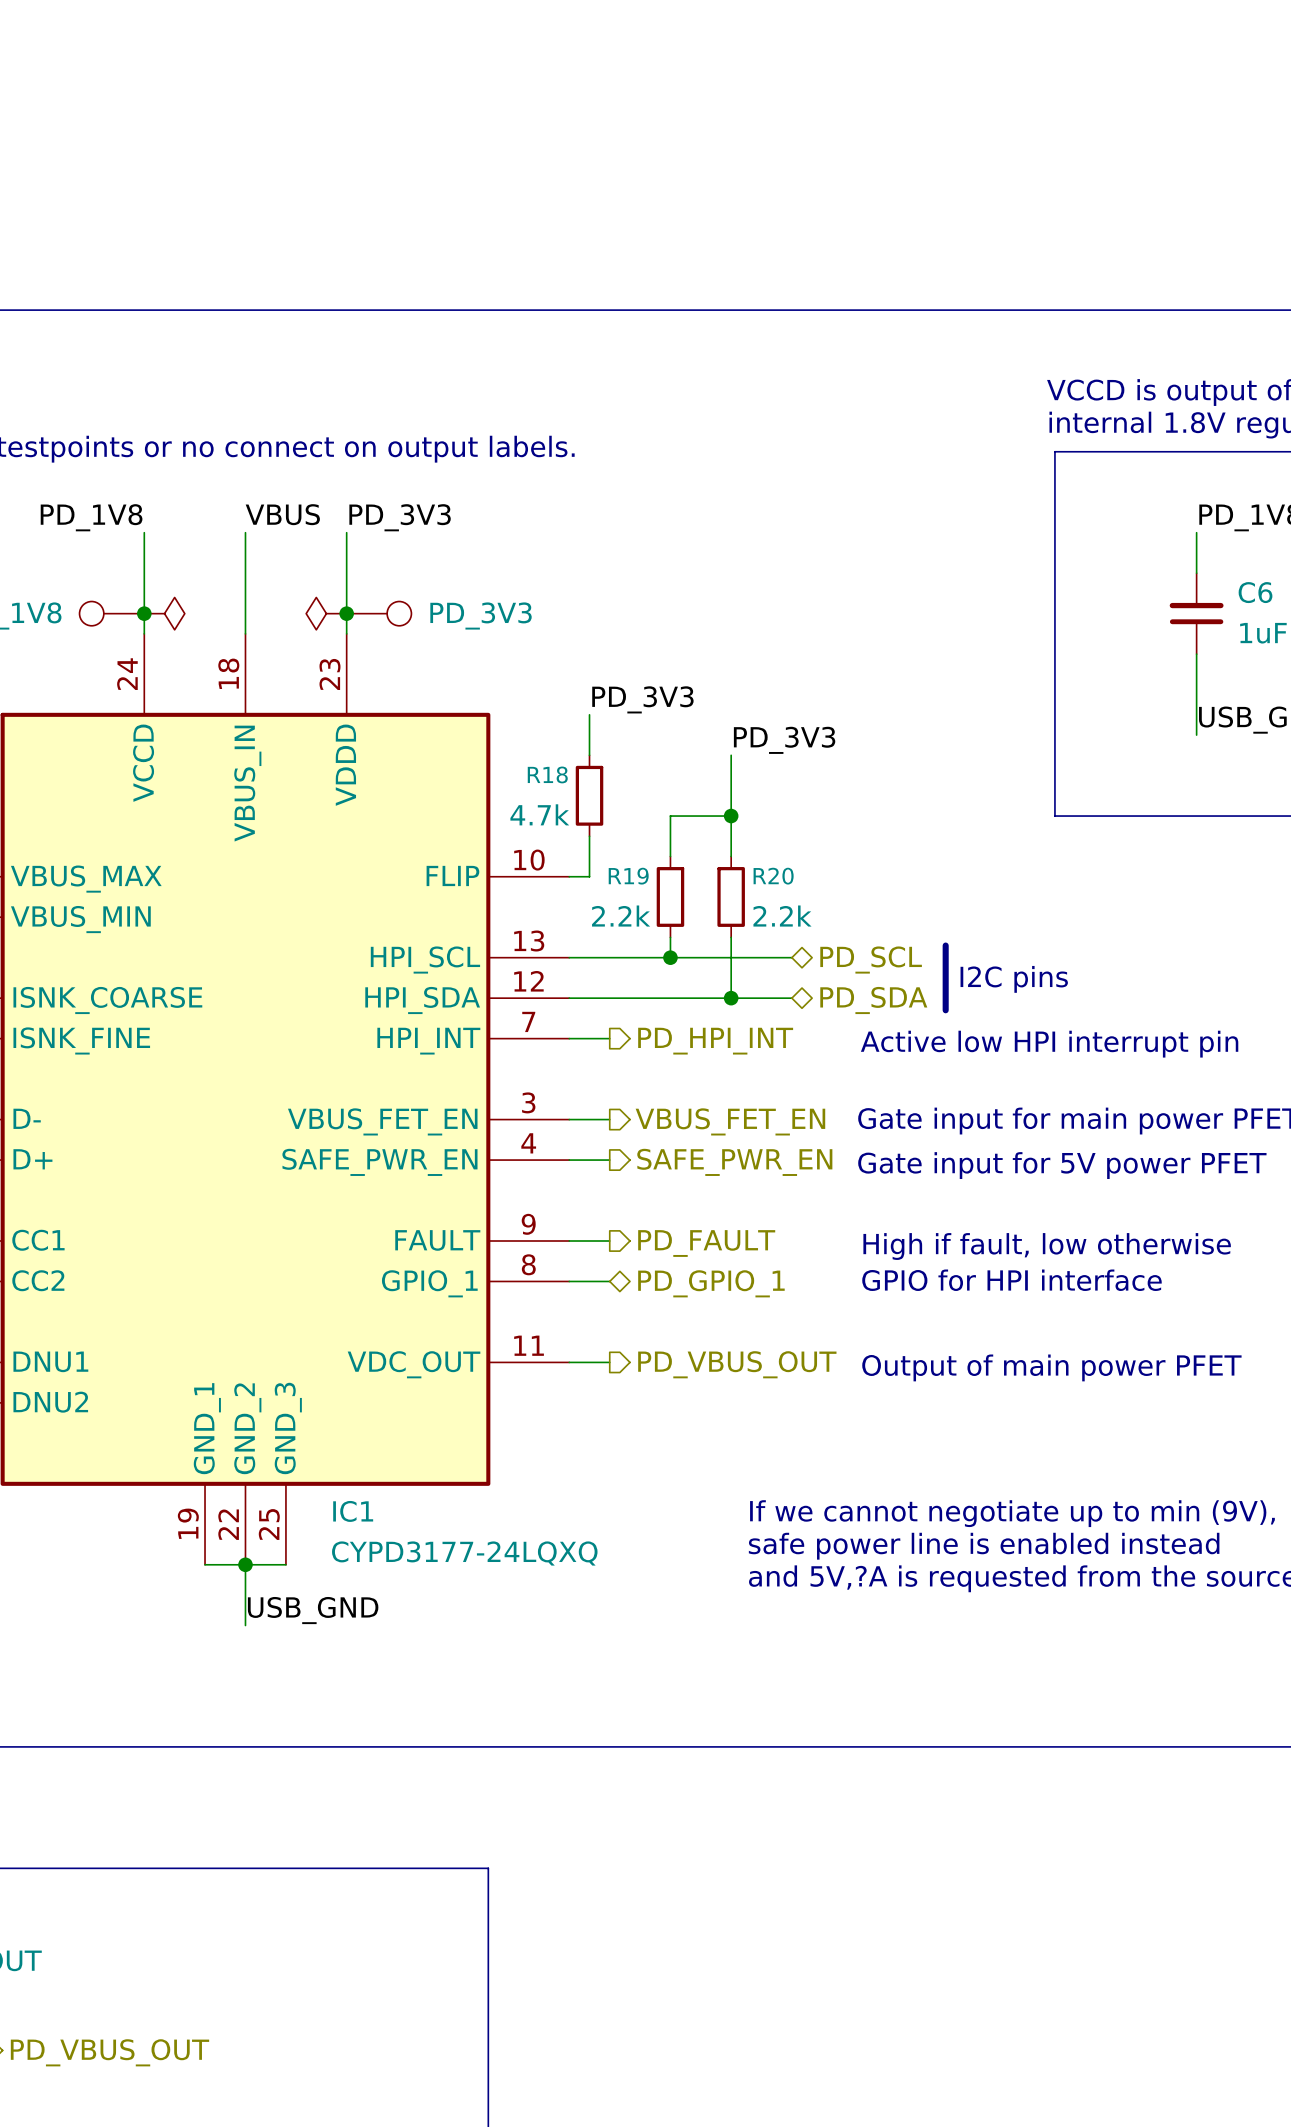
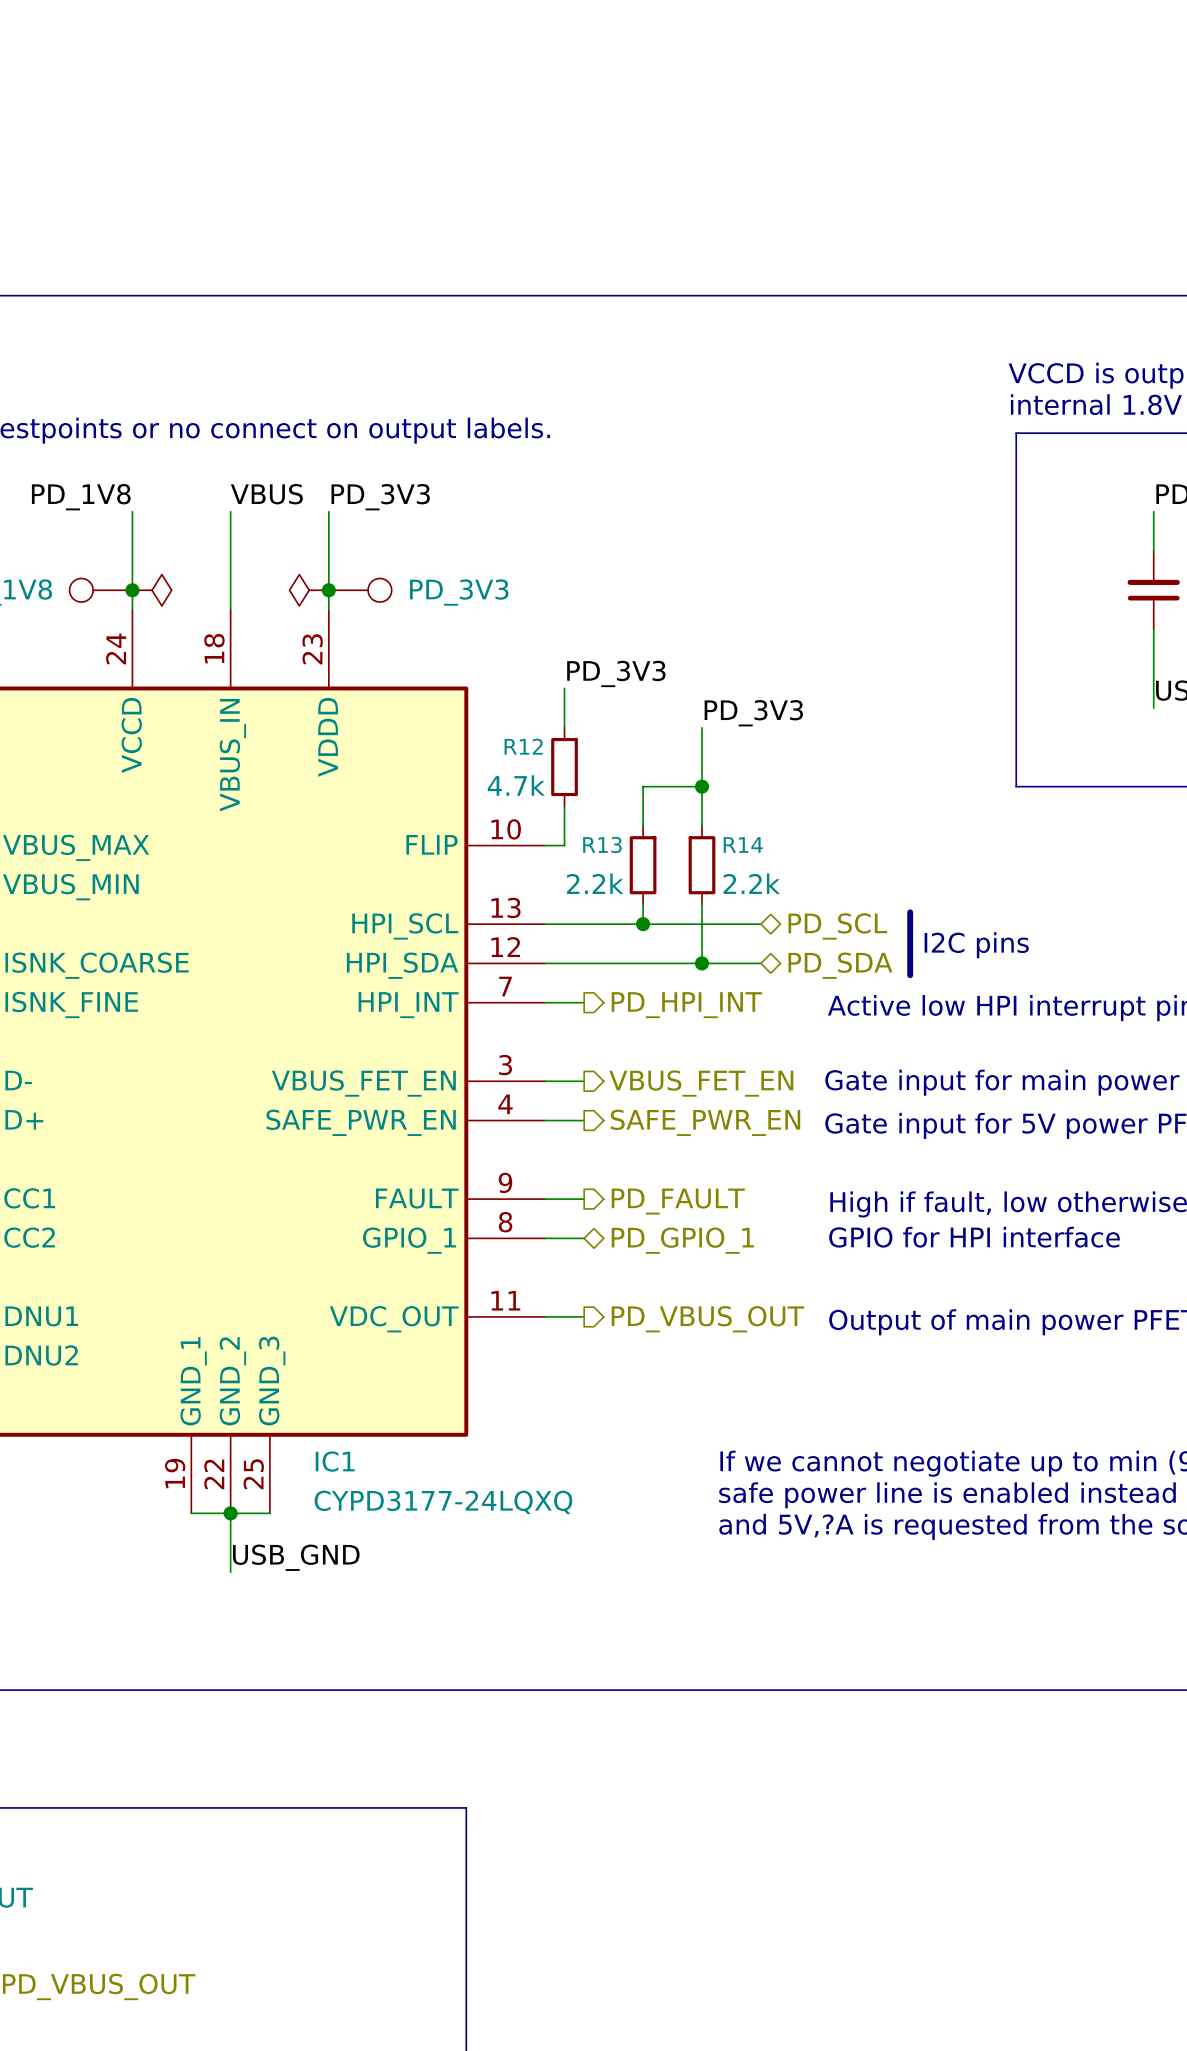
R18 name: R18 (547, 774) -> R12 (523, 746)
R19 name: R19 (628, 876) -> R13 (602, 845)
R20 name: R20 (773, 876) -> R14 (743, 845)

